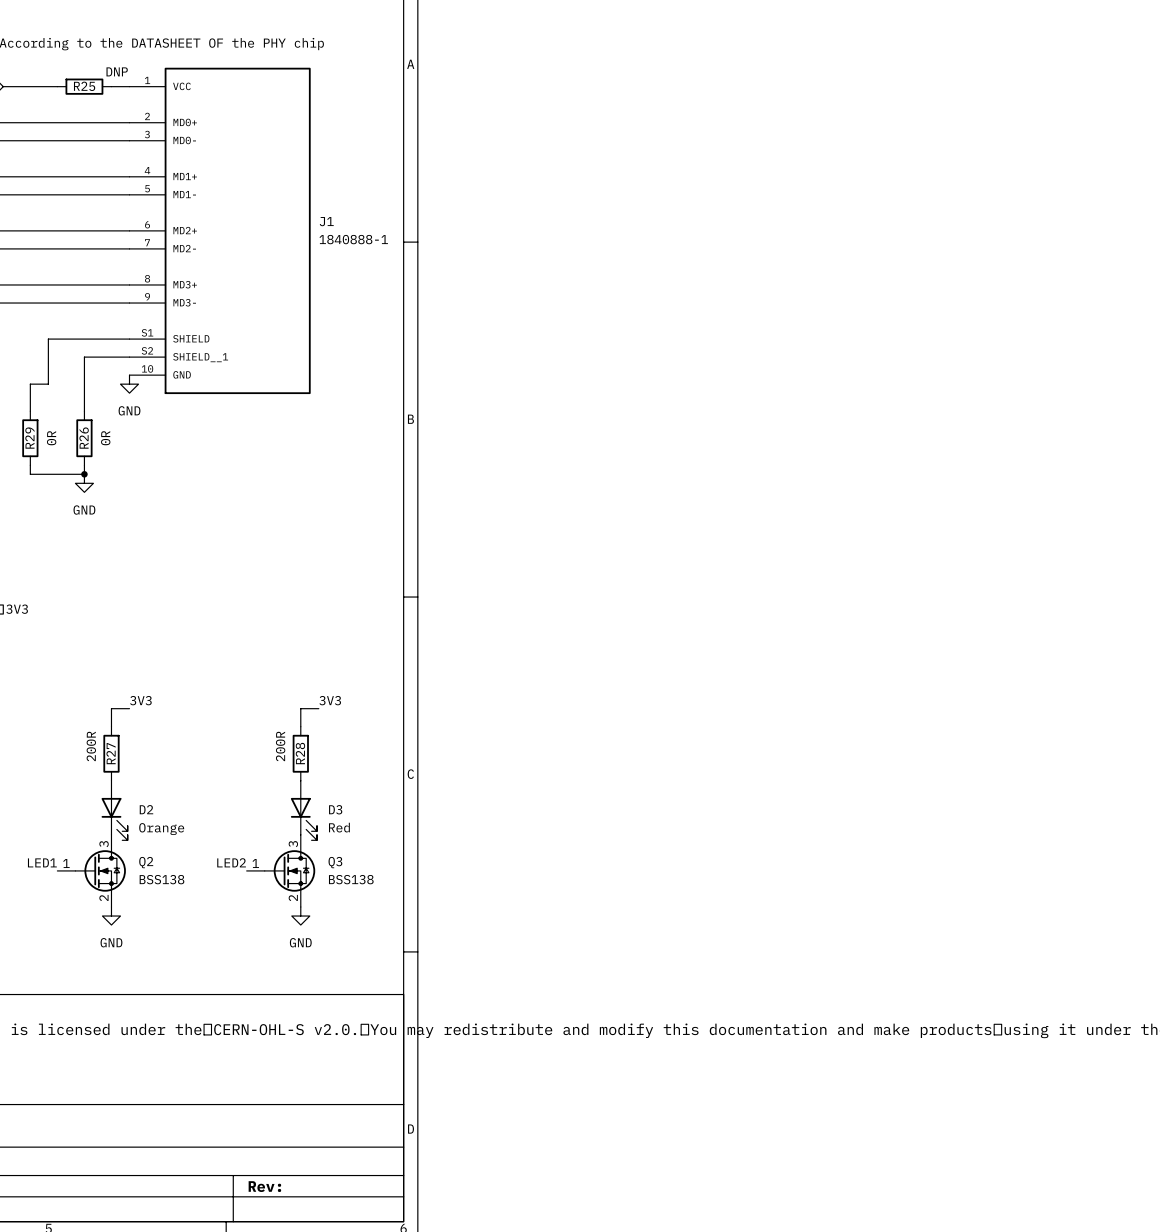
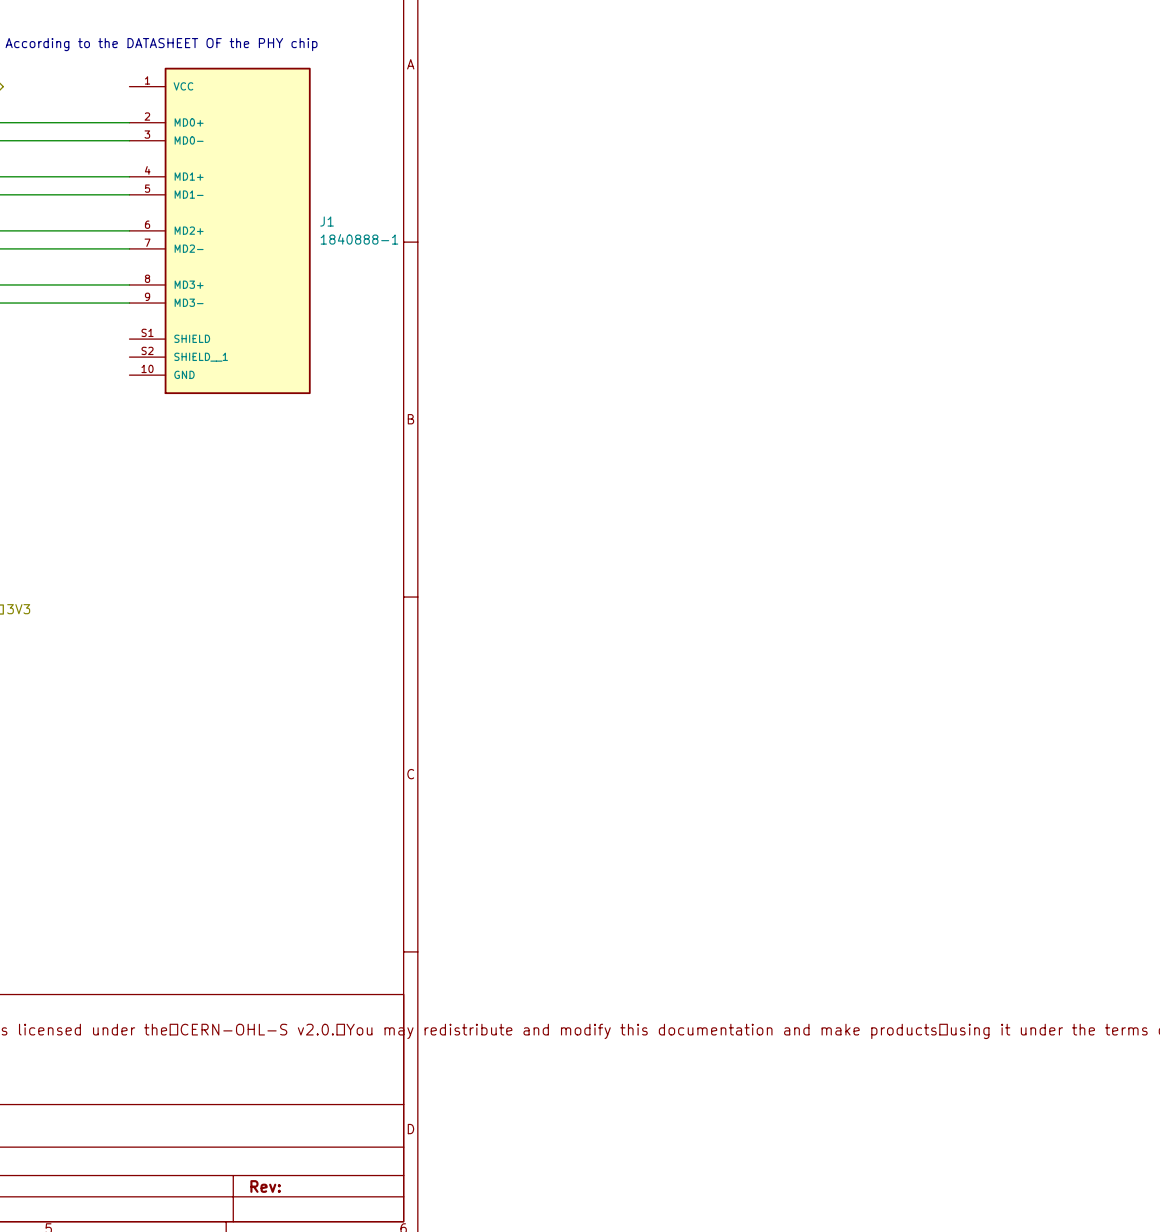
wire: (3, 86) (57, 86) -> none
R25: DNP (84, 86) -> none
wire: (111, 86) (129, 86) -> none
wire: (129, 339) (48, 339) (48, 384) (30, 384) (30, 411) -> none
wire: (129, 357) (84, 357) (84, 411) -> none
power symbol: GND (129, 384) -> none
R29: 0R (30, 438) -> none
R26: 0R (84, 438) -> none
wire: (30, 465) (30, 474) (84, 474) (84, 465) -> none
junction: (84, 474) -> none
power symbol: GND (84, 483) -> none
label: 3V3 (140, 700) -> none
label: 3V3 (330, 700) -> none
wire: (129, 708) (111, 708) (111, 726) -> none
wire: (318, 708) (300, 708) (300, 726) -> none
R27: 200R (111, 753) -> none
R28: 200R (300, 753) -> none
D2: Orange (114, 810) -> none
D3: Red (303, 810) -> none
label: LED1 (42, 862) -> none
label: LED2 (231, 862) -> none
Q2: BSS138 (91, 870) -> none
Q3: BSS138 (280, 870) -> none
power symbol: GND (111, 916) -> none
power symbol: GND (300, 916) -> none

